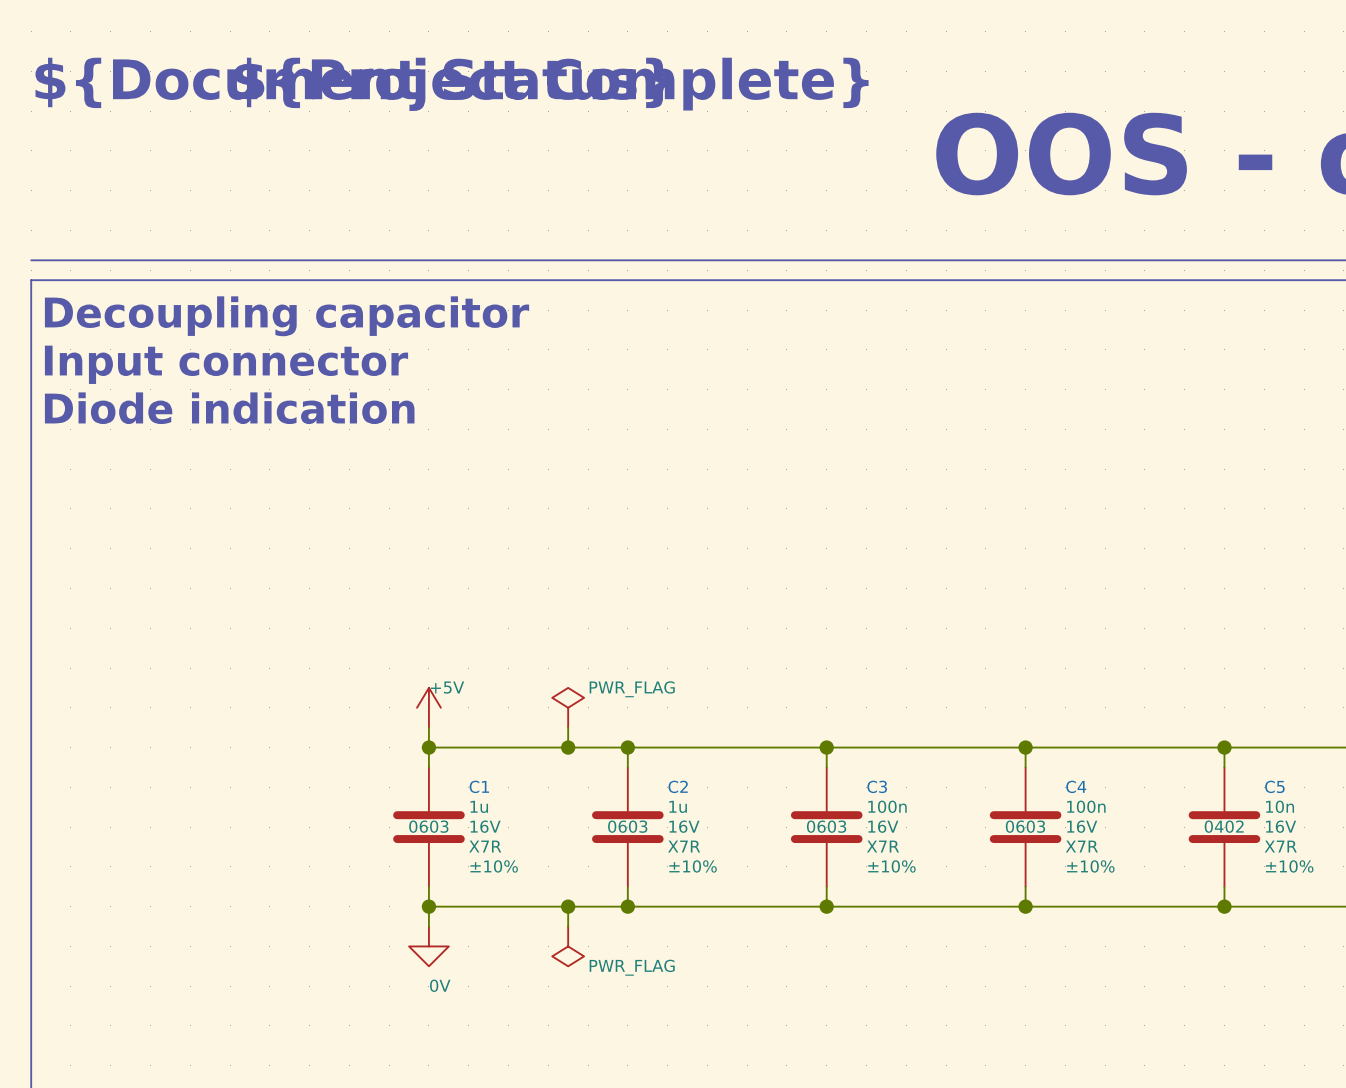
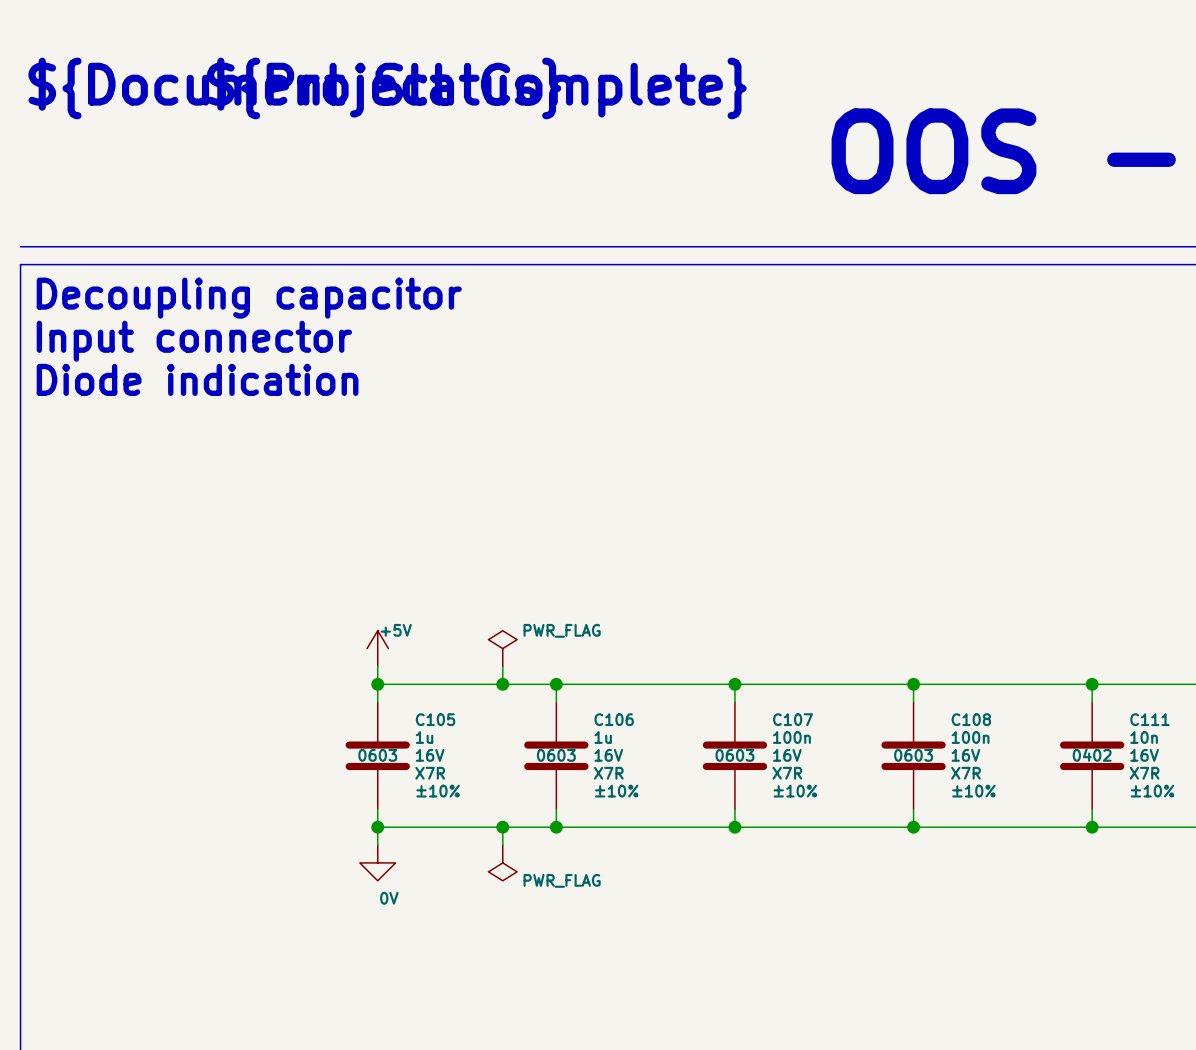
C1 name: C1 (479, 786) -> C105 (435, 719)
C2 name: C2 (678, 786) -> C106 (614, 719)
C3 name: C3 (877, 786) -> C107 (793, 719)
C4 name: C4 (1076, 786) -> C108 (971, 719)
C5 name: C5 (1274, 786) -> C111 (1149, 719)

